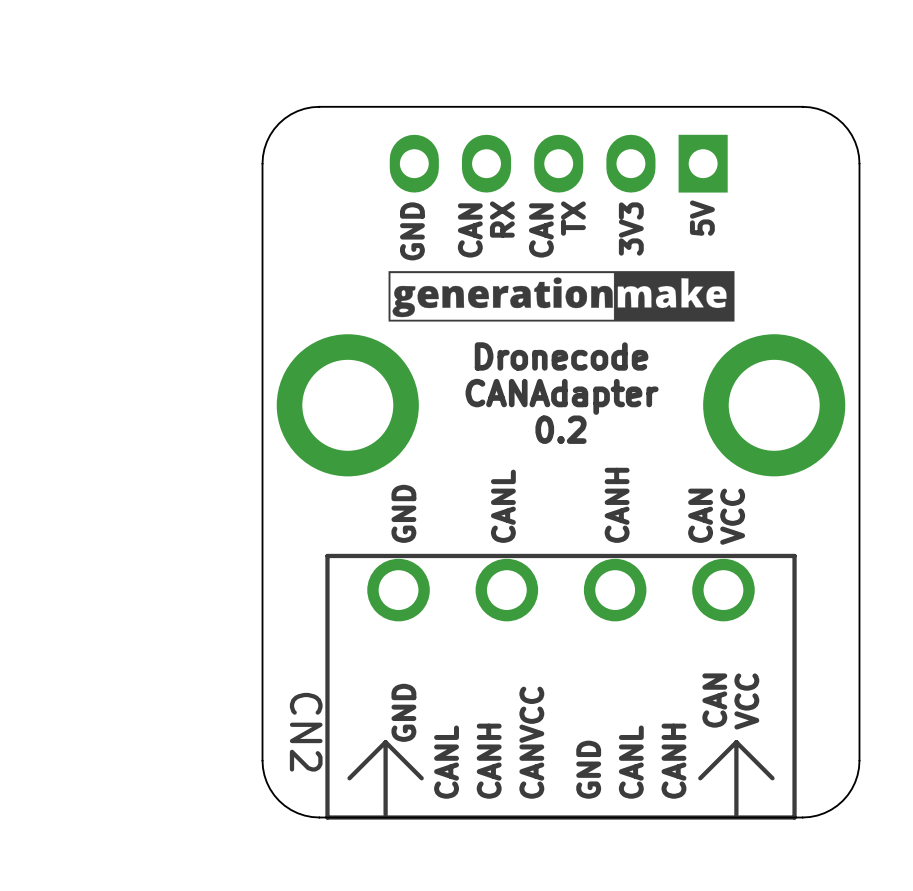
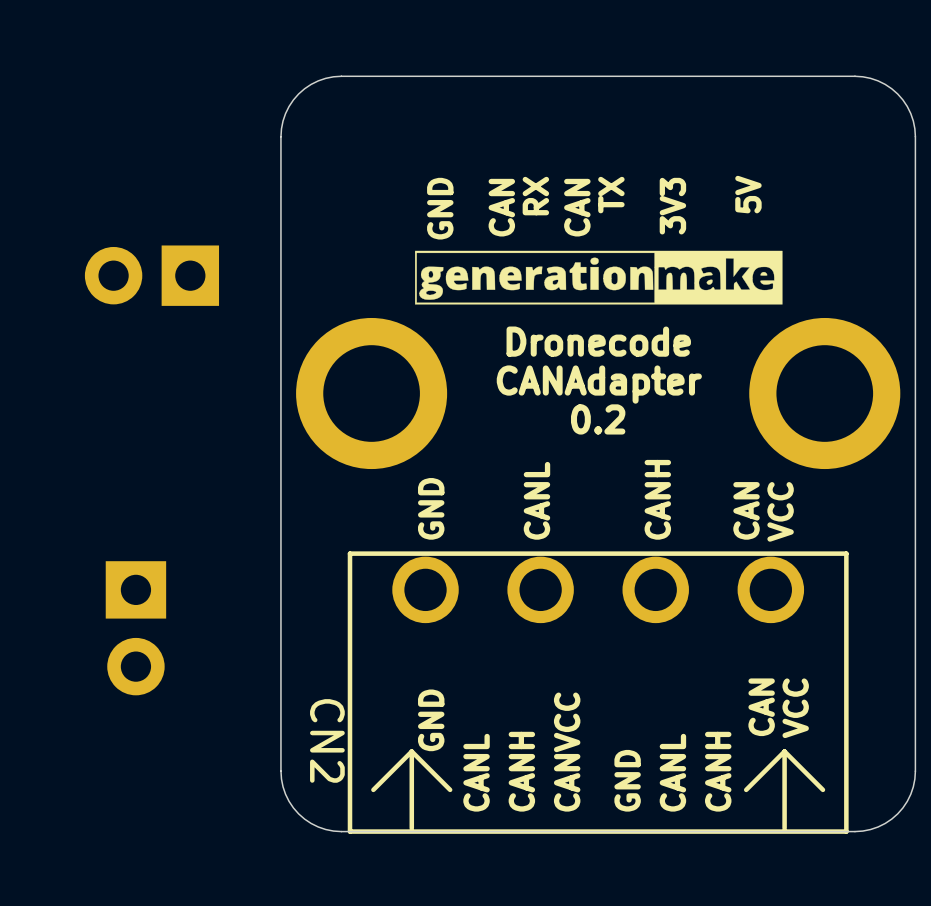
part: (558, 163) -> none
part: none -> (151, 275)
part: none -> (135, 628)

